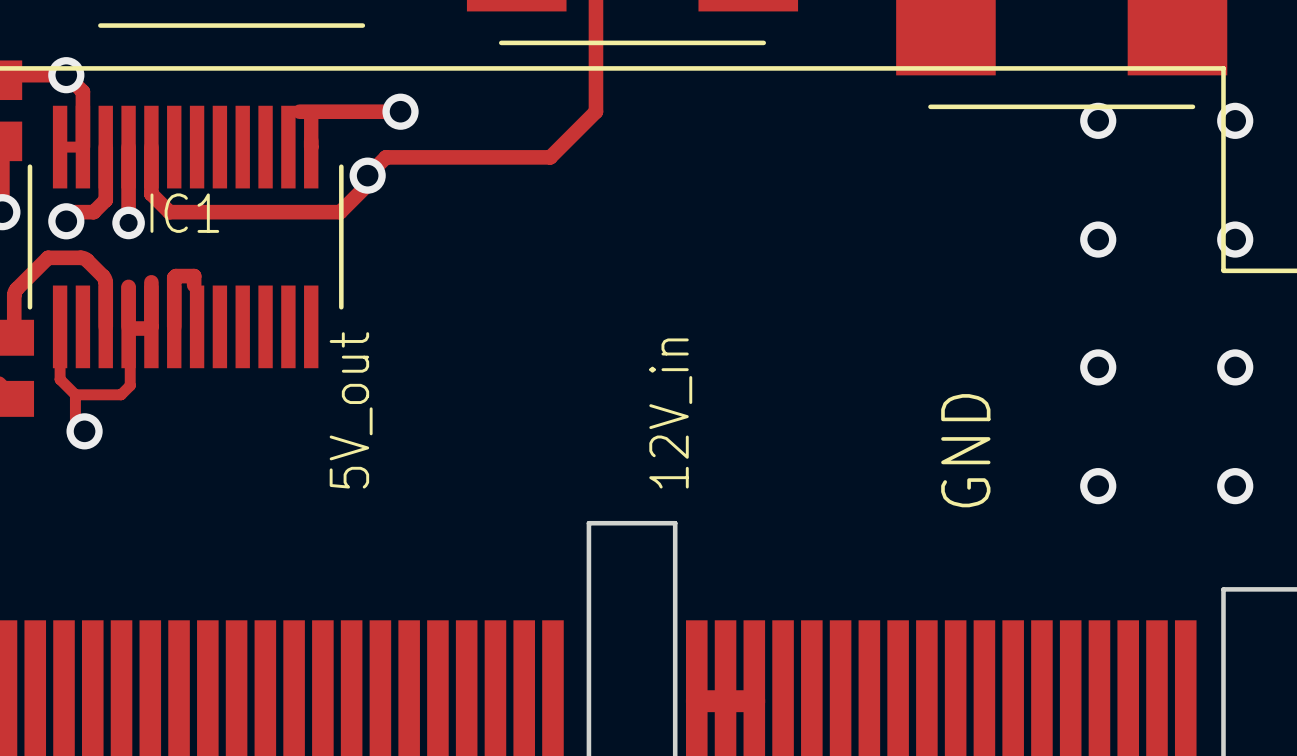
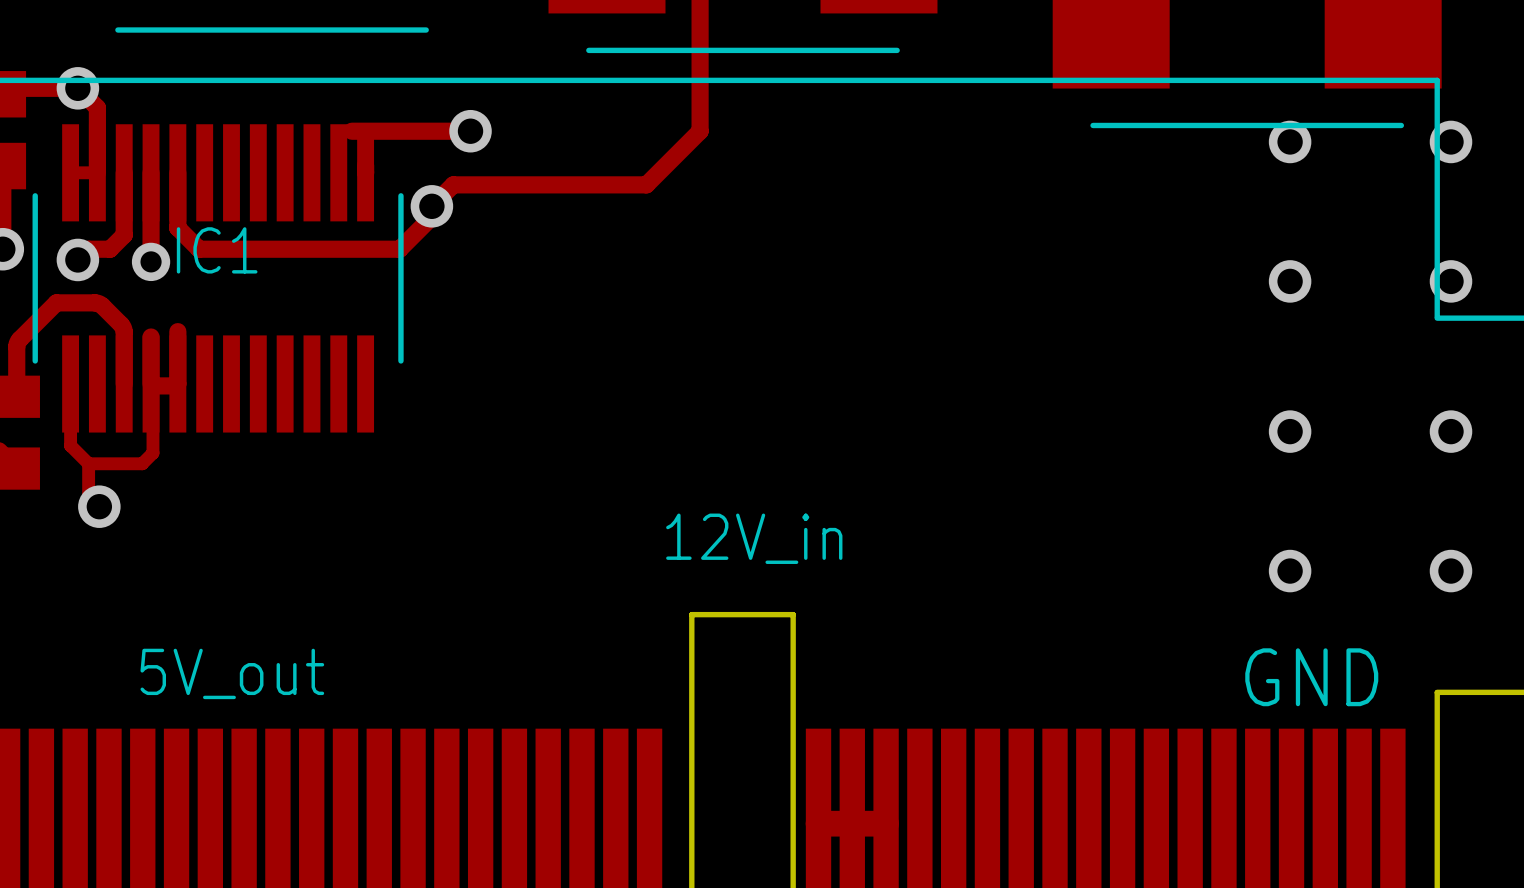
track: (174, 326) (174, 277) (175, 276) (194, 276) (194, 323) (197, 326) -> none
text rotation: 0° (351, 410) -> 90° clockwise (232, 673)
text position: 5V_out (351, 410) -> 5V_out (232, 673)
text rotation: 0° (670, 413) -> 90° clockwise (754, 538)
text rotation: 0° (965, 450) -> 90° clockwise (1311, 677)
text position: GND (965, 450) -> GND (1311, 677)

